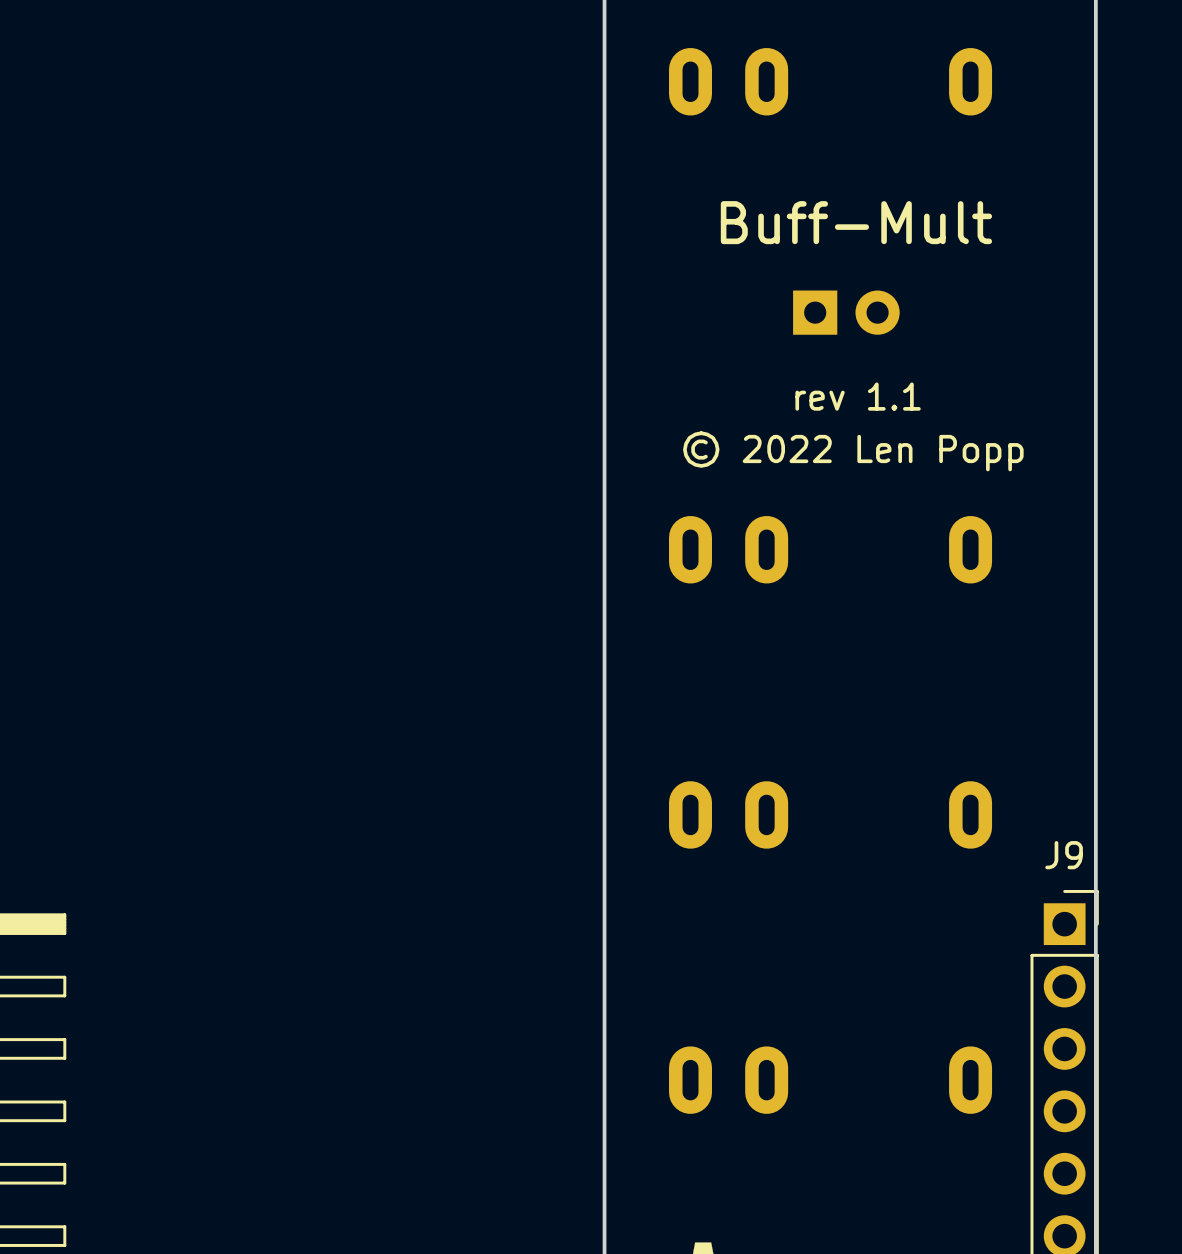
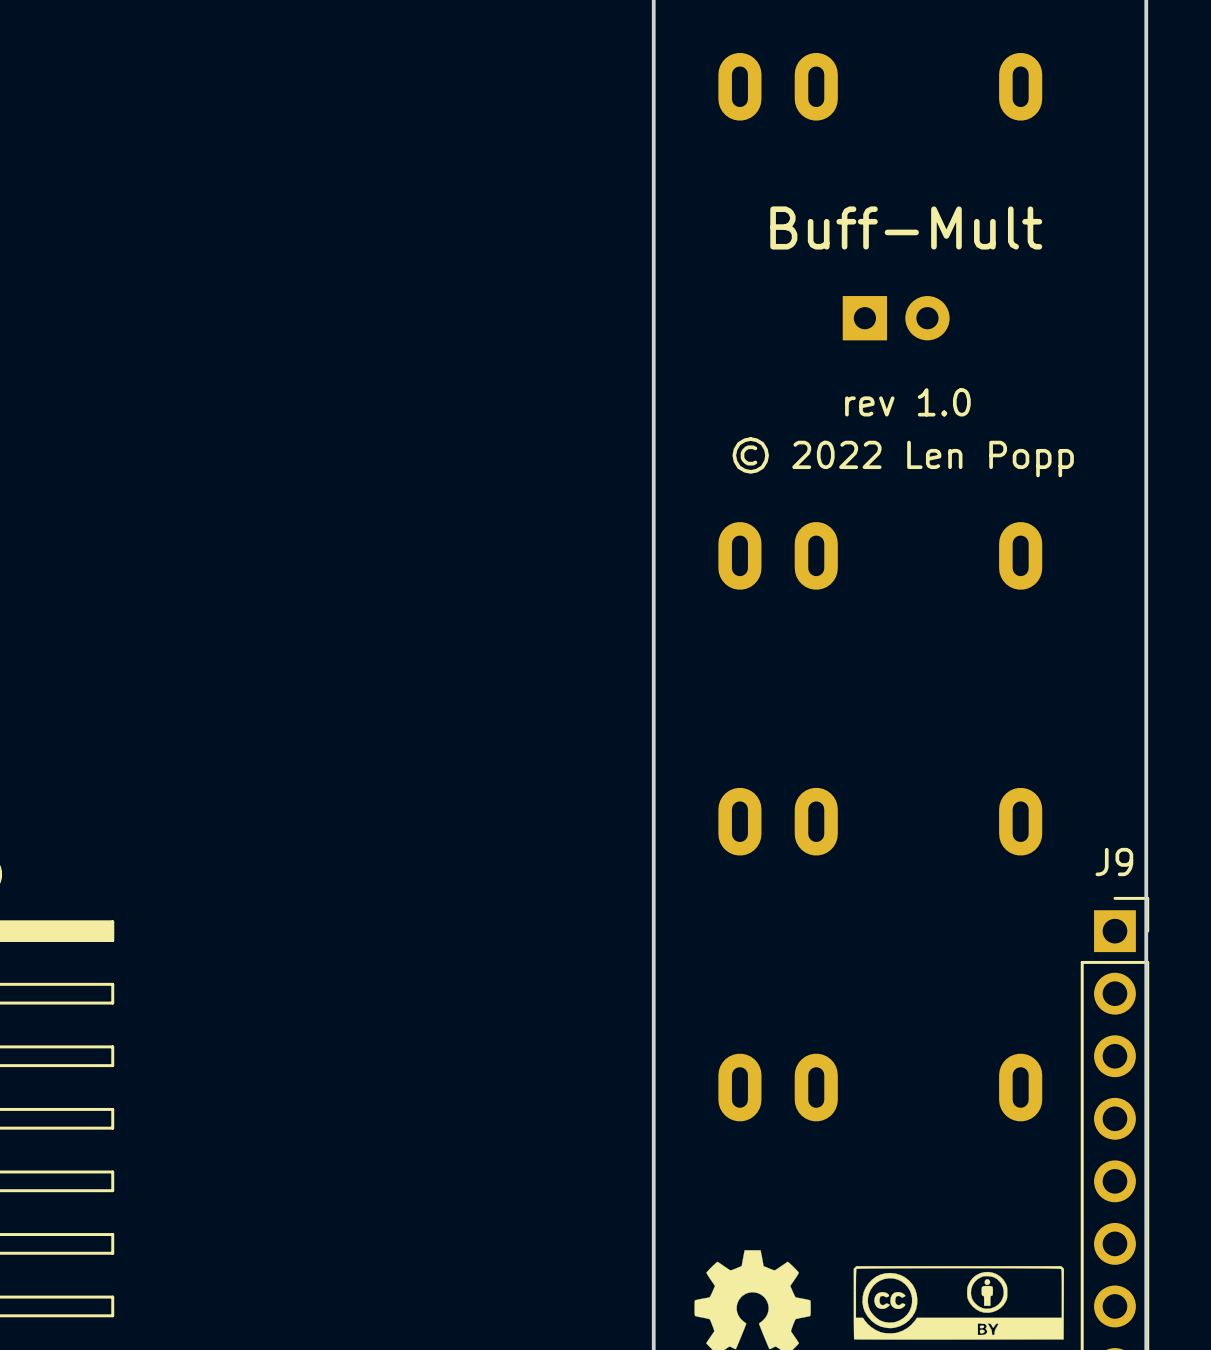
text: rev 1.1 (858, 396) -> rev 1.0 (907, 402)

